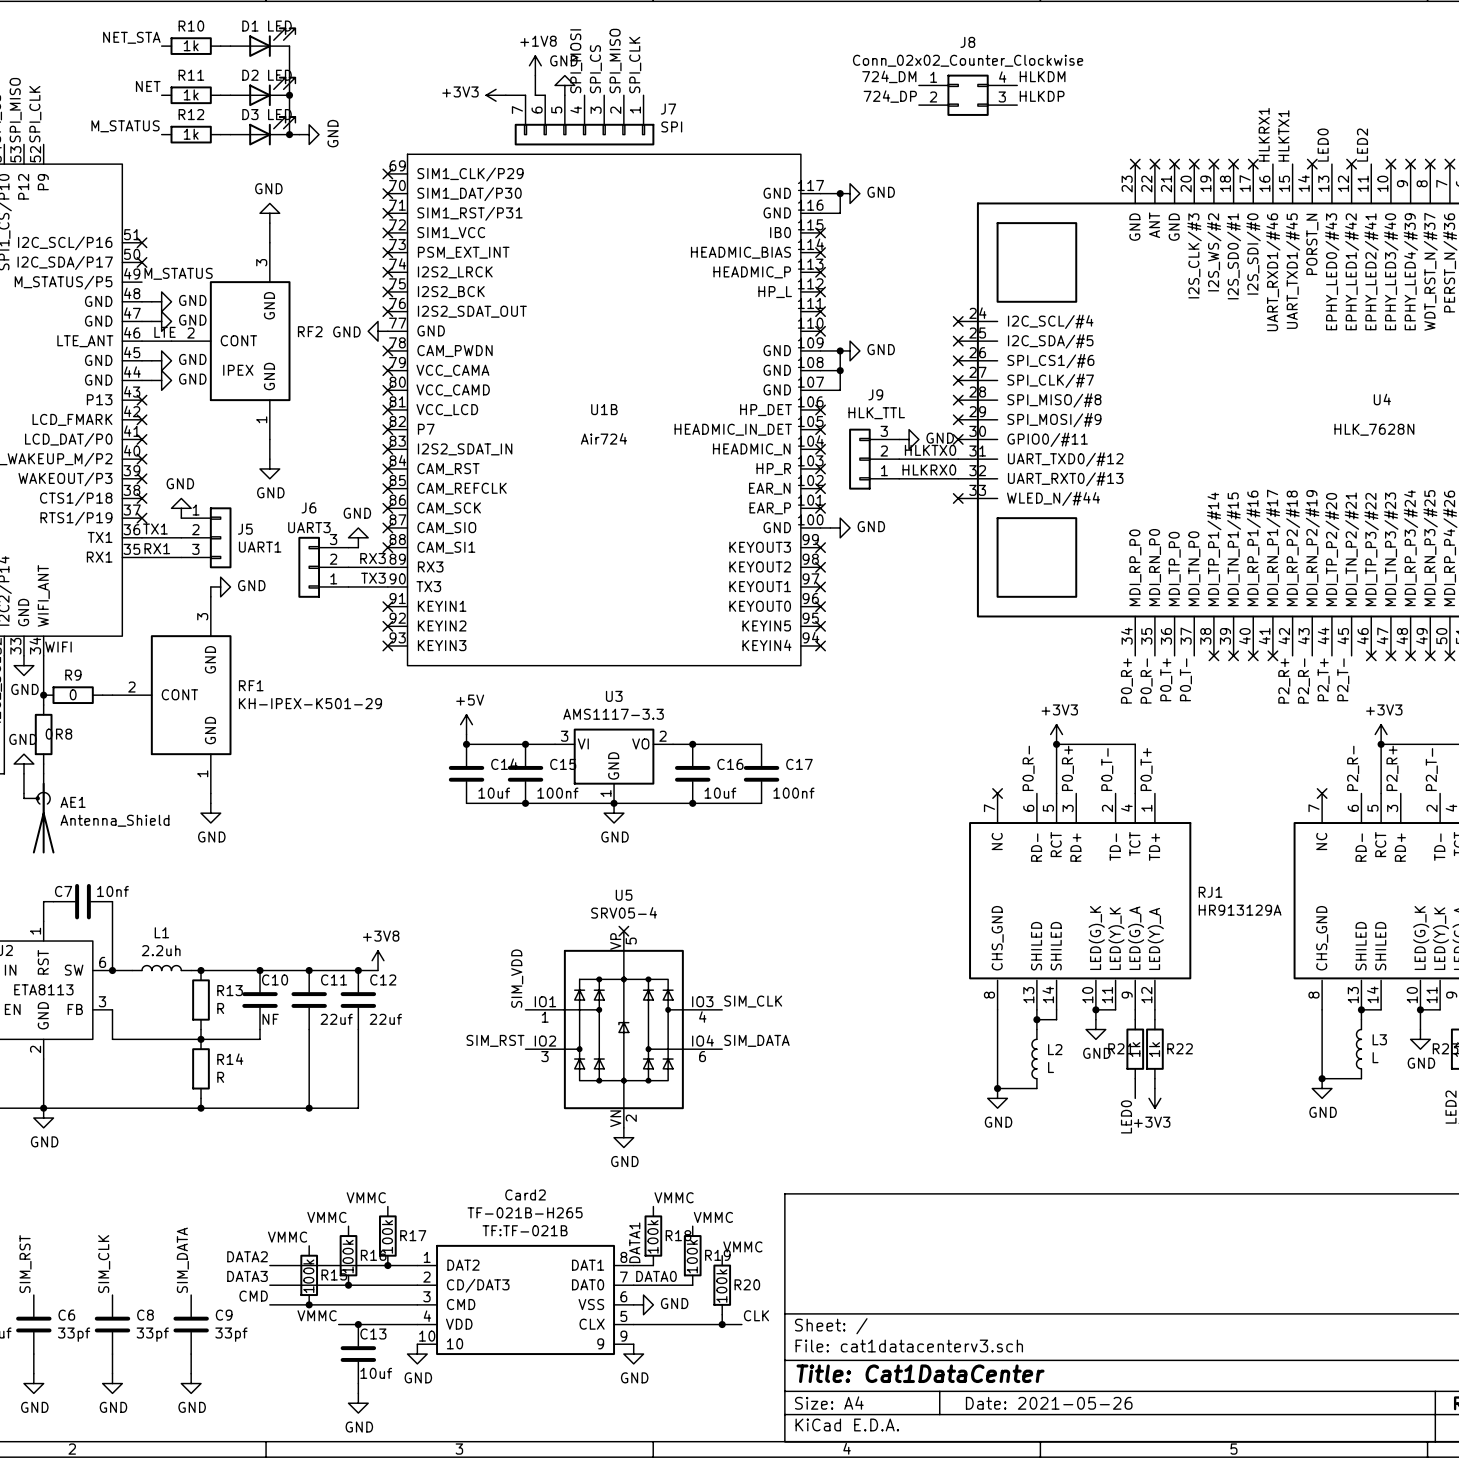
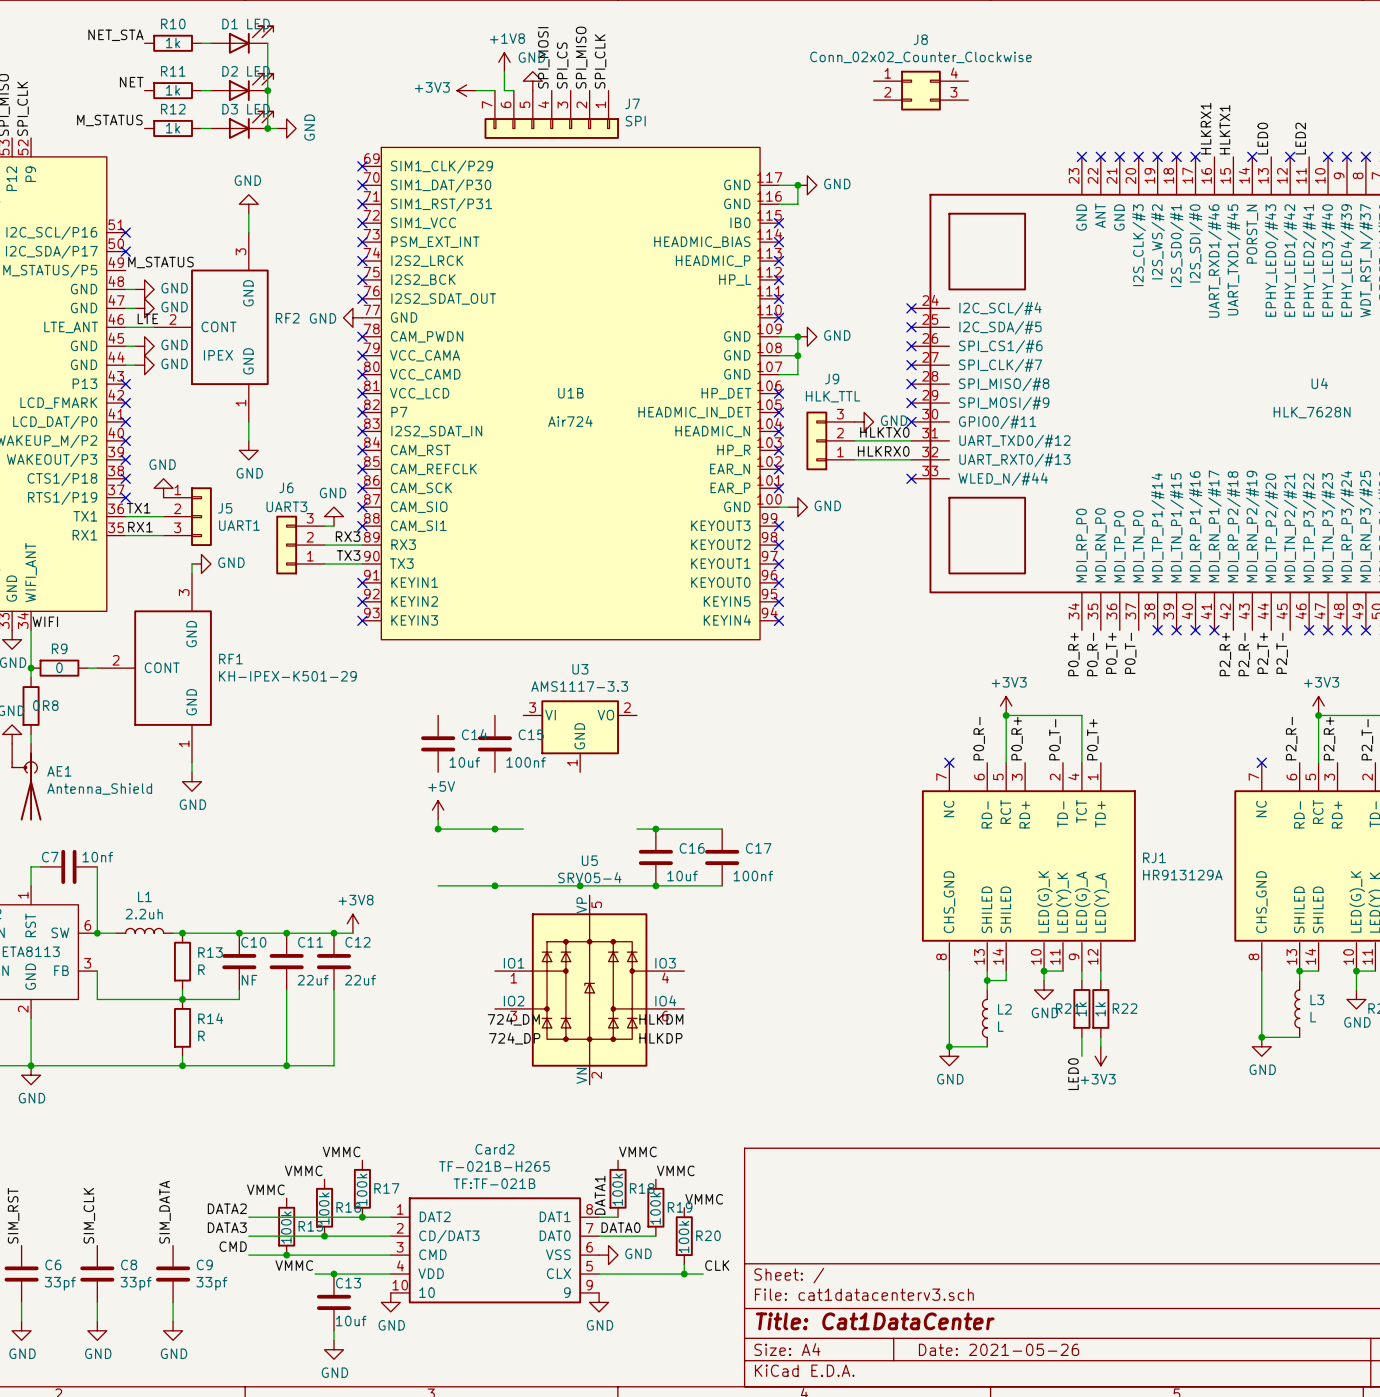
label: 724_DM (889, 76) -> none
label: HLKDM (1042, 76) -> none
label: 724_DP (890, 96) -> none
label: HLKDP (1042, 96) -> none
power symbol position: +5V (466, 724) -> +5V (438, 810)
wire: (466, 734) (466, 744) (555, 744) -> (438, 819) (438, 829) (523, 829)
junction: (466, 744) -> none
junction: (525, 744) -> none
wire: (673, 744) (761, 744) -> (636, 829) (722, 829)
junction: (692, 744) -> none
C16 position: (692, 773) -> (655, 857)
C17 position: (761, 773) -> (722, 857)
wire: (466, 803) (761, 803) -> (438, 885) (722, 885)
junction: (525, 803) -> none
junction: (614, 803) -> none
junction: (692, 803) -> none
power symbol: GND (614, 813) -> none
junction: none -> (438, 829)
junction: none -> (494, 829)
junction: none -> (655, 829)
junction: none -> (494, 885)
junction: none -> (580, 885)
junction: none -> (655, 885)
no-connect mark: (623, 931) -> none
label: SIM_VDD (517, 978) -> none
label: SIM_CLK (753, 1001) -> none
label: SIM_RST (495, 1040) -> none
label: SIM_DATA (756, 1040) -> none
label: none -> 724_DM (513, 1019)
label: none -> HLKDM (661, 1019)
label: none -> 724_DP (514, 1038)
label: none -> HLKDP (660, 1038)
power symbol: GND (623, 1137) -> none

